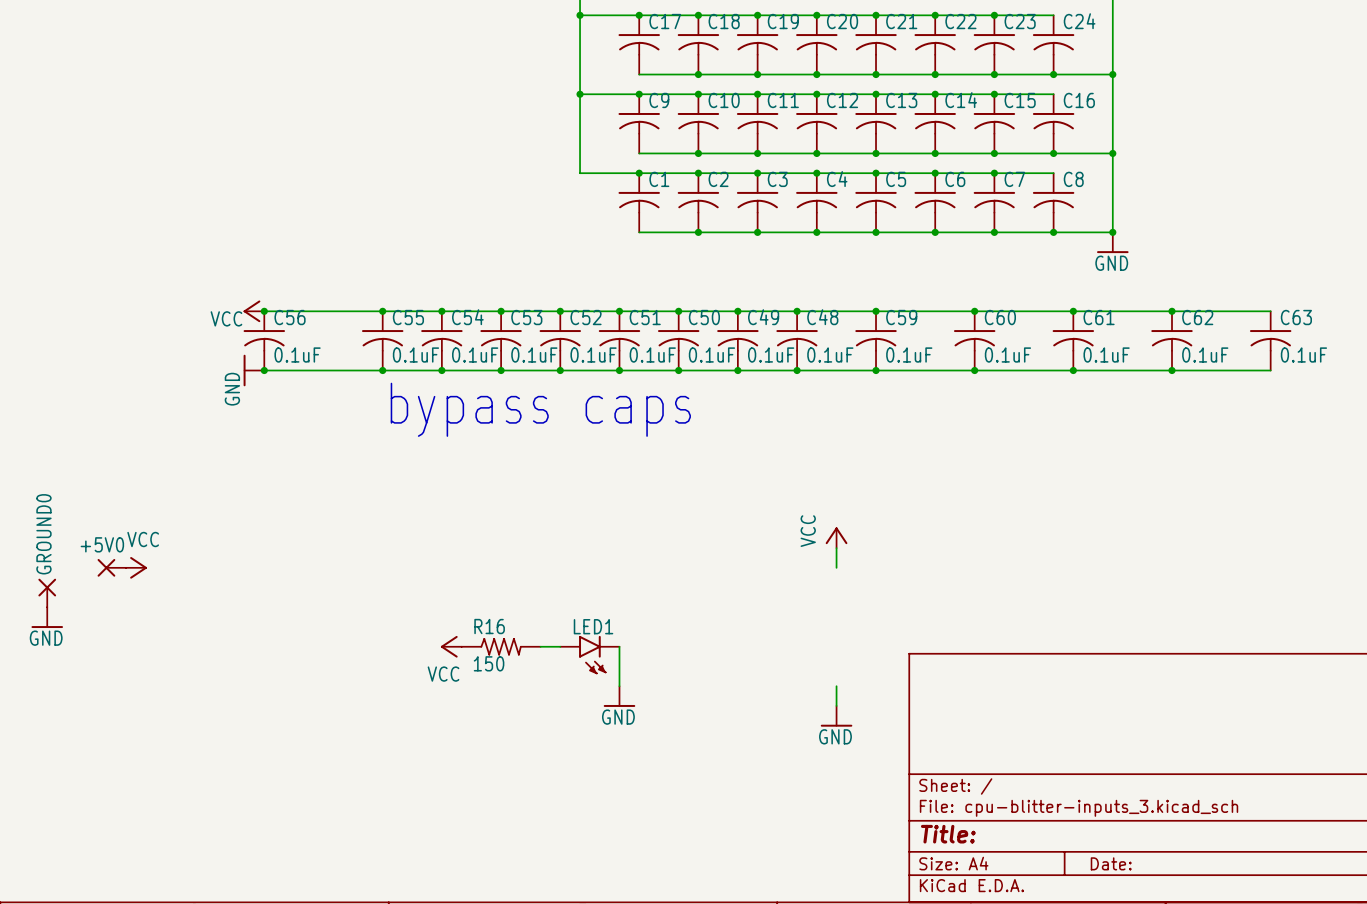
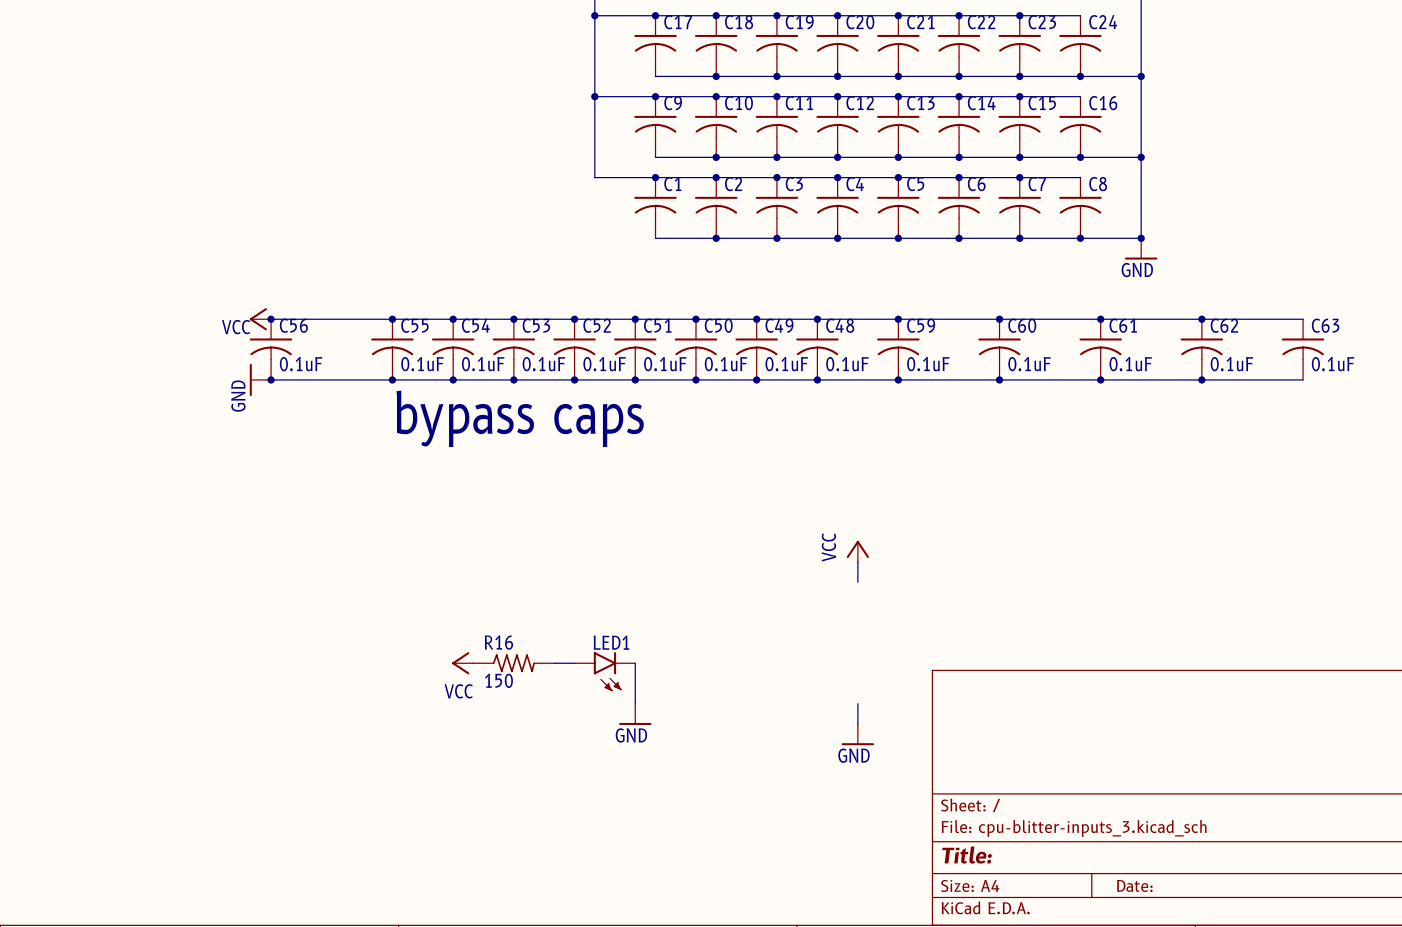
+5V0: (111, 567) -> none
power symbol: VCC (136, 567) -> none
GROUND0: (47, 592) -> none
power symbol: GND (47, 617) -> none

